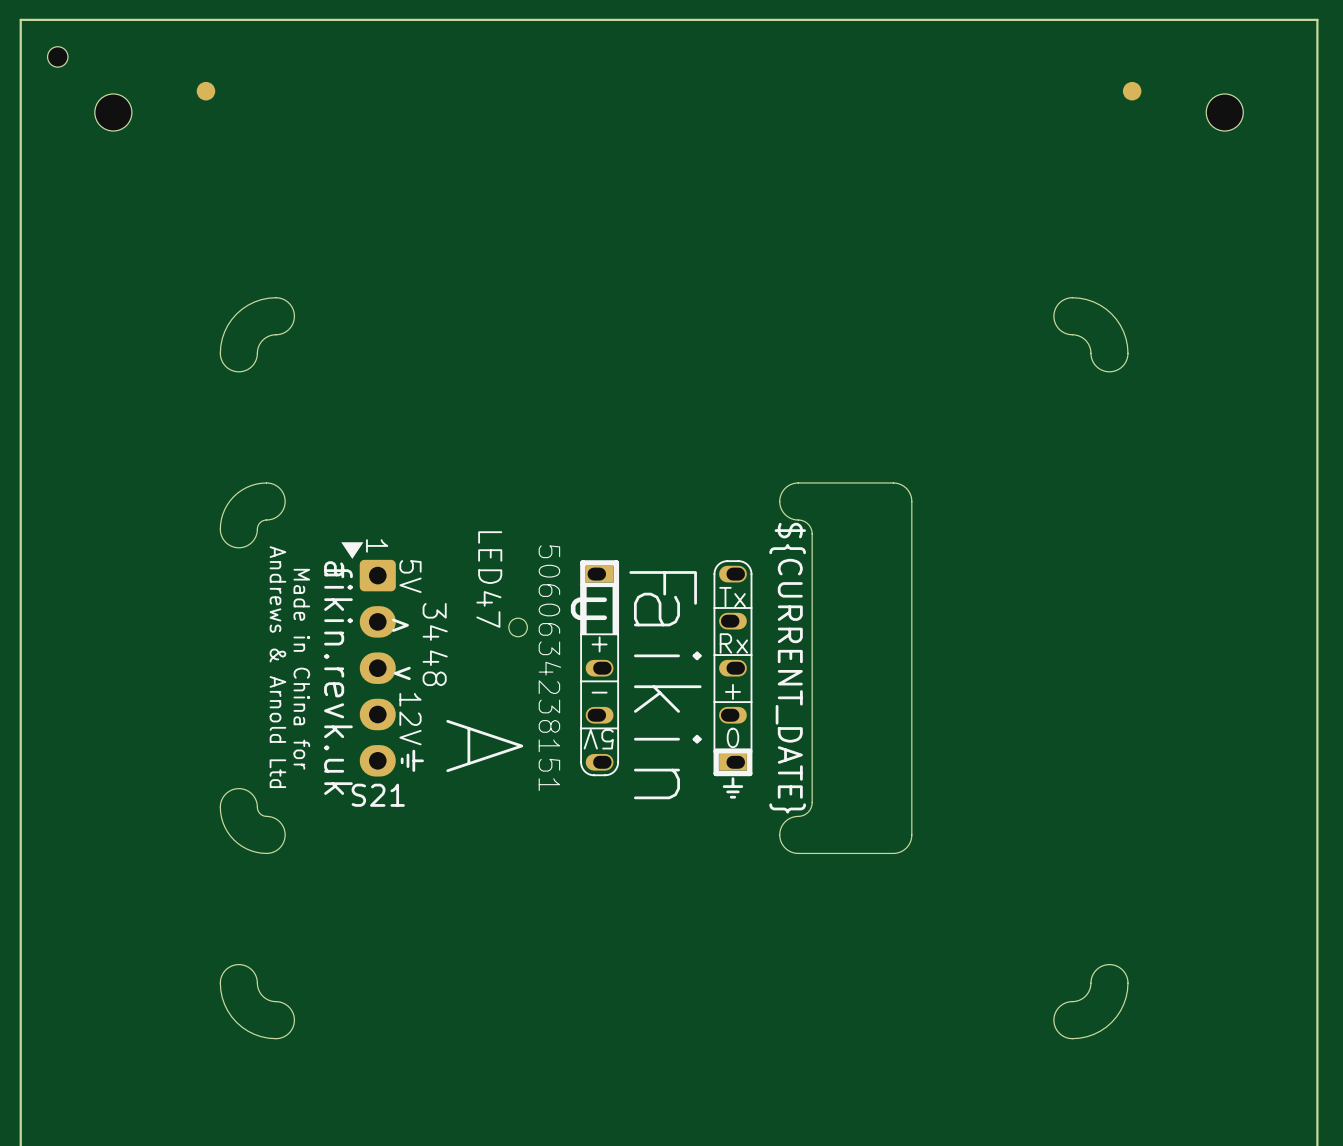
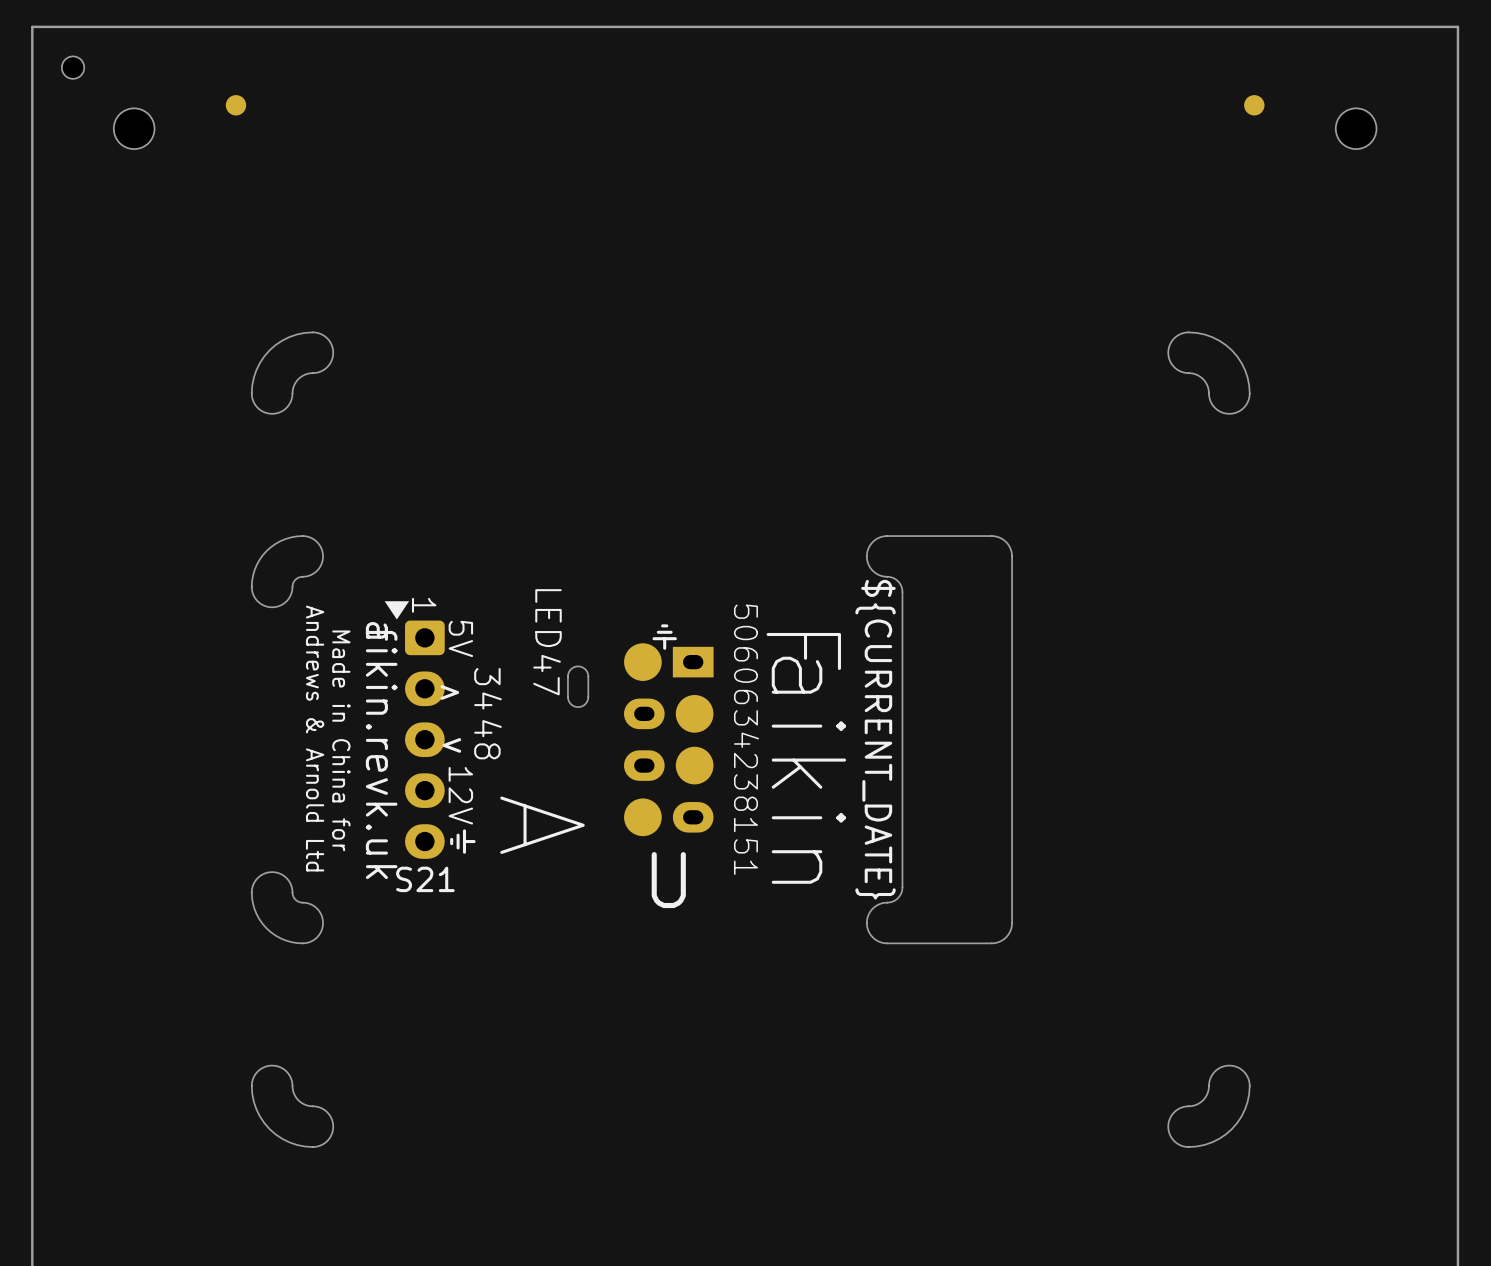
part footprint: [580, 560, 620, 777] -> [623, 643, 714, 837]
text position: F (663, 587) -> F (803, 651)
board edge: none -> (588, 676) (587, 701) (580, 706) (573, 705) (568, 698) (569, 671) (574, 667) (580, 666) (586, 670) (588, 676)
round board edge: [508, 617, 528, 638] -> none
text position: 5060634238151 (549, 668) -> 5060634238151 (746, 739)
part: (732, 668) -> none
text position: aikin (667, 695) -> aikin (808, 770)

